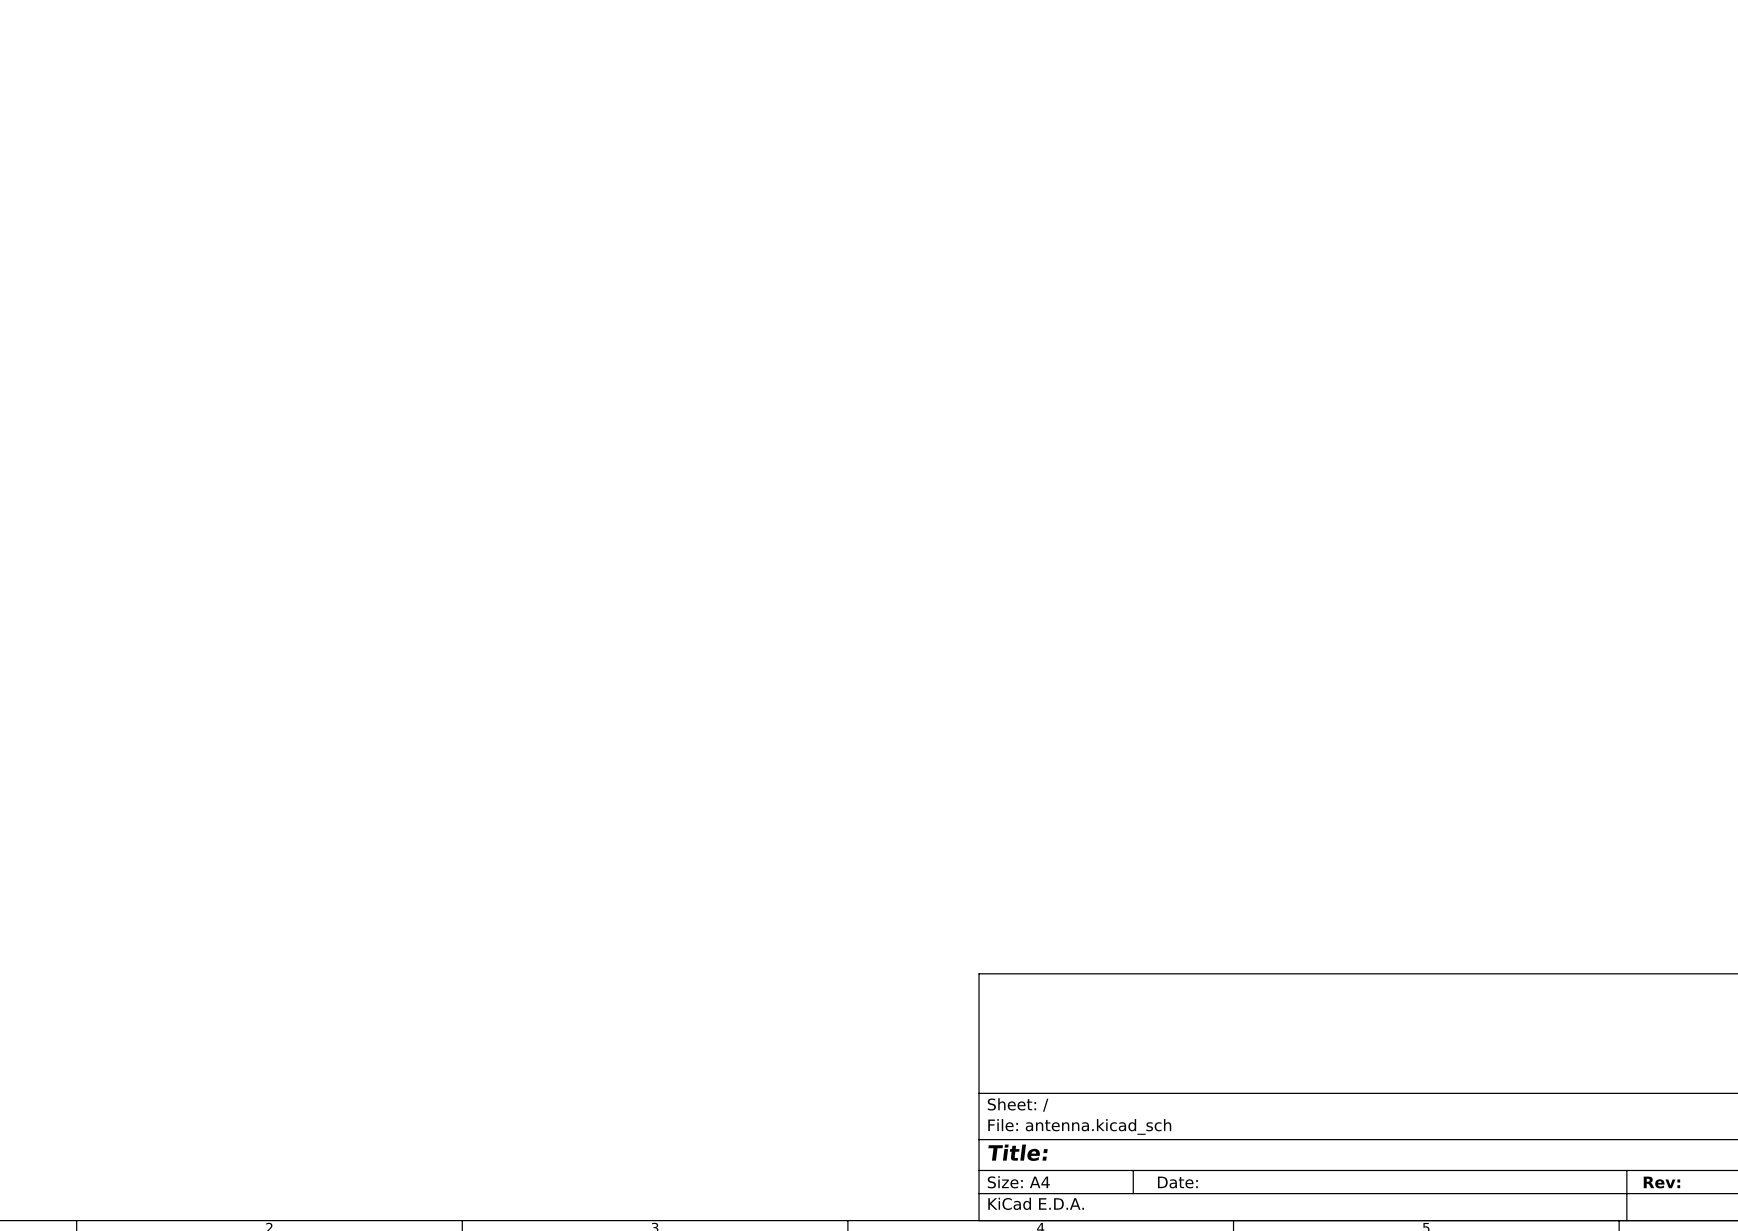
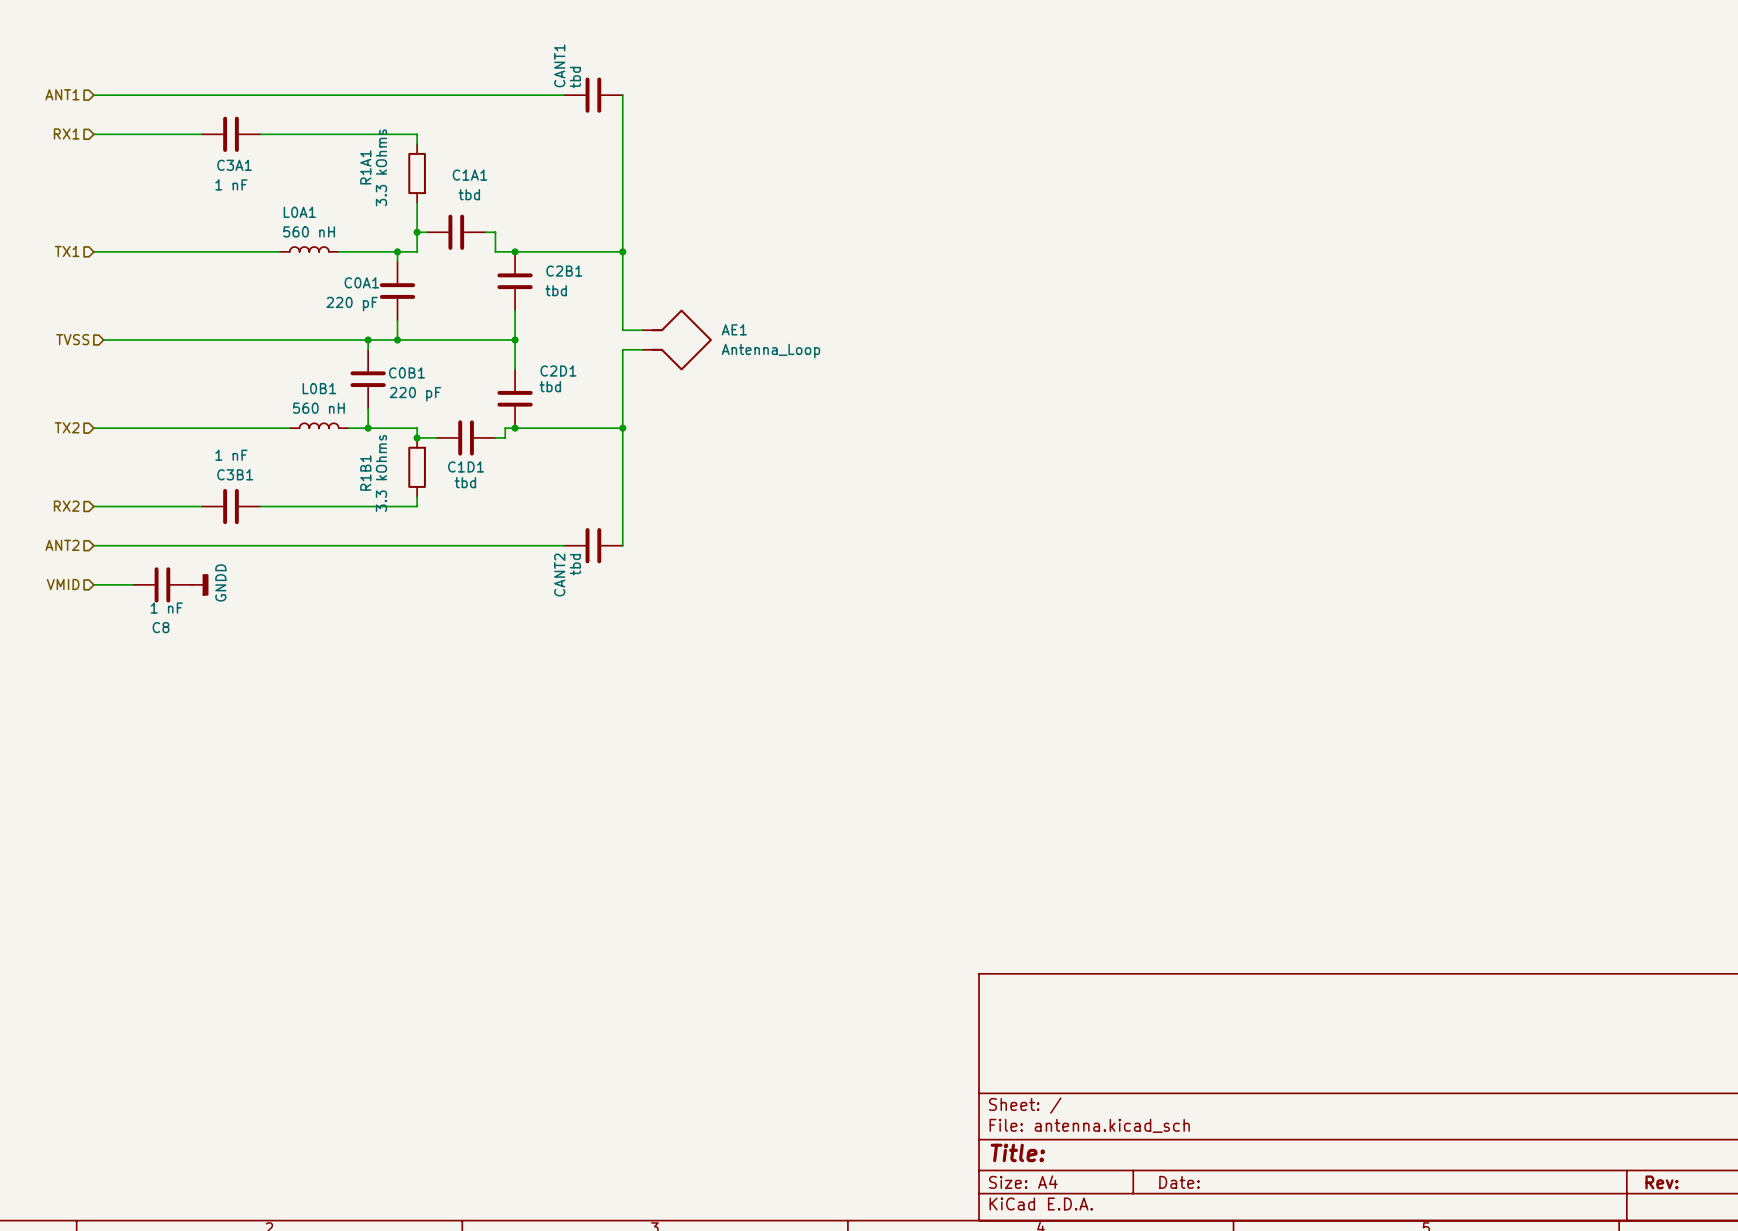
hierarchical label: none -> ANT1 (62, 94)
wire: none -> (93, 95) (564, 95)
CANT1: none -> tbd (593, 95)
wire: none -> (622, 95) (622, 330) (642, 330)
hierarchical label: none -> RX1 (66, 133)
wire: none -> (93, 134) (201, 134)
C3A1: none -> 1 nF (231, 134)
wire: none -> (260, 134) (417, 134) (417, 144)
R1A1: none -> 3.3 kOhms (417, 173)
wire: none -> (417, 202) (417, 251) (338, 251)
wire: none -> (417, 232) (426, 232)
junction: none -> (417, 232)
C1A1: none -> tbd (456, 232)
wire: none -> (485, 232) (495, 232) (495, 251) (622, 251)
L0A1: none -> 560 nH (309, 249)
hierarchical label: none -> TX1 (67, 251)
wire: none -> (93, 251) (279, 251)
wire: none -> (397, 251) (397, 261)
junction: none -> (397, 251)
junction: none -> (515, 251)
junction: none -> (622, 251)
C2B1: none -> tbd (515, 281)
C0A1: none -> 220 pF (397, 291)
wire: none -> (515, 310) (515, 369)
wire: none -> (397, 320) (397, 340)
hierarchical label: none -> TVSS (72, 339)
wire: none -> (103, 340) (515, 340)
wire: none -> (368, 340) (368, 349)
junction: none -> (368, 340)
junction: none -> (397, 340)
junction: none -> (515, 340)
AE1: none -> Antenna_Loop (677, 340)
wire: none -> (642, 349) (622, 349) (622, 545)
C0B1: none -> 220 pF (368, 379)
C2D1: none -> tbd (515, 398)
wire: none -> (368, 408) (368, 428)
L0B1: none -> 560 nH (319, 425)
hierarchical label: none -> TX2 (67, 427)
wire: none -> (93, 428) (289, 428)
wire: none -> (348, 428) (417, 428) (417, 437) (436, 437)
junction: none -> (368, 428)
junction: none -> (515, 428)
wire: none -> (622, 428) (505, 428) (505, 437) (495, 437)
junction: none -> (622, 428)
junction: none -> (417, 437)
C1D1: none -> tbd (466, 437)
R1B1: none -> 3.3 kOhms (417, 467)
wire: none -> (417, 496) (417, 506) (260, 506)
hierarchical label: none -> RX2 (66, 506)
wire: none -> (93, 506) (201, 506)
C3B1: none -> 1 nF (231, 506)
hierarchical label: none -> ANT2 (62, 545)
wire: none -> (93, 545) (564, 545)
CANT2: none -> tbd (593, 545)
hierarchical label: none -> VMID (63, 584)
wire: none -> (93, 584) (133, 584)
C8: none -> 1 nF (162, 584)
power symbol: none -> GNDD (200, 584)

